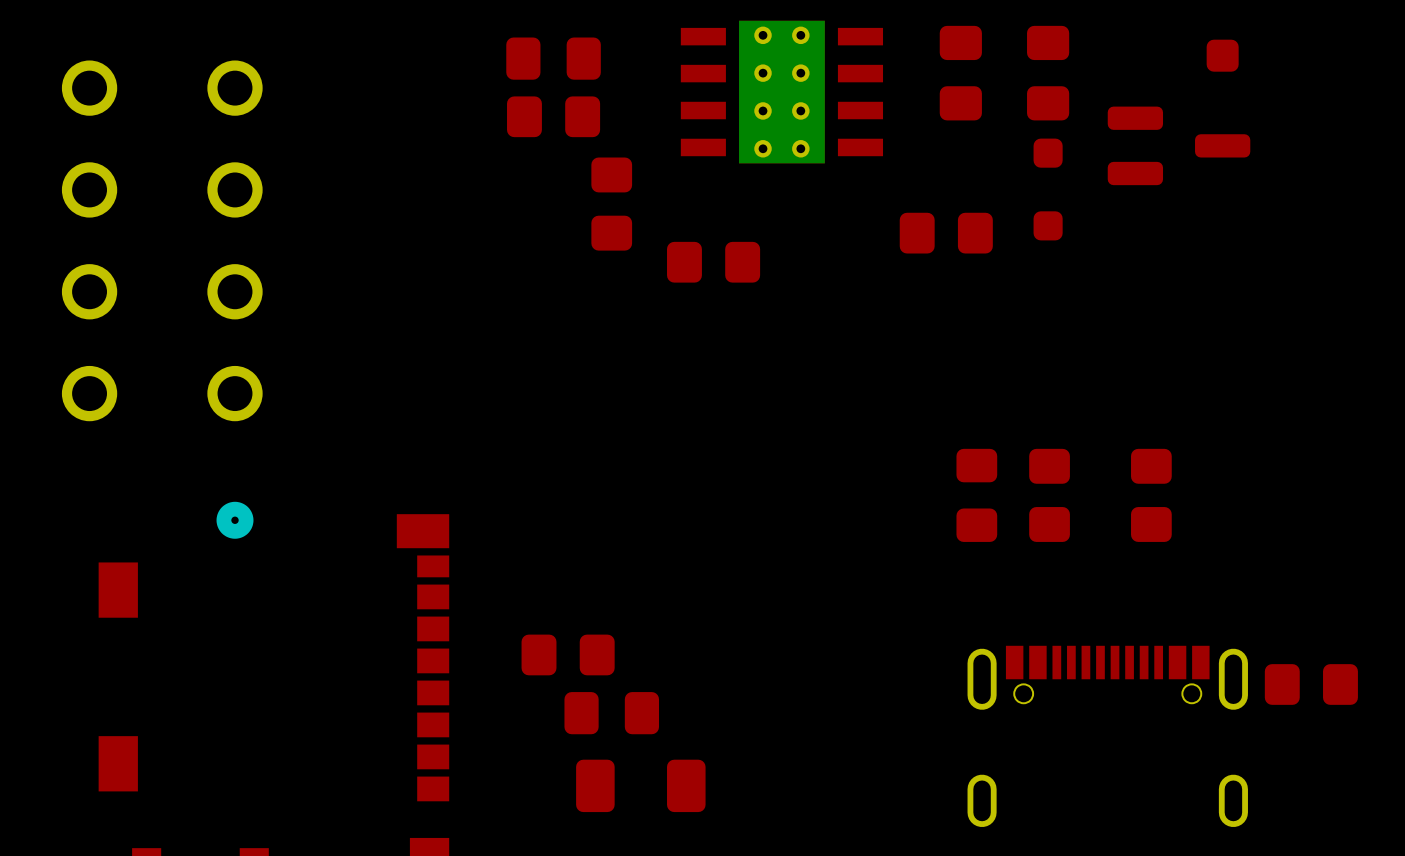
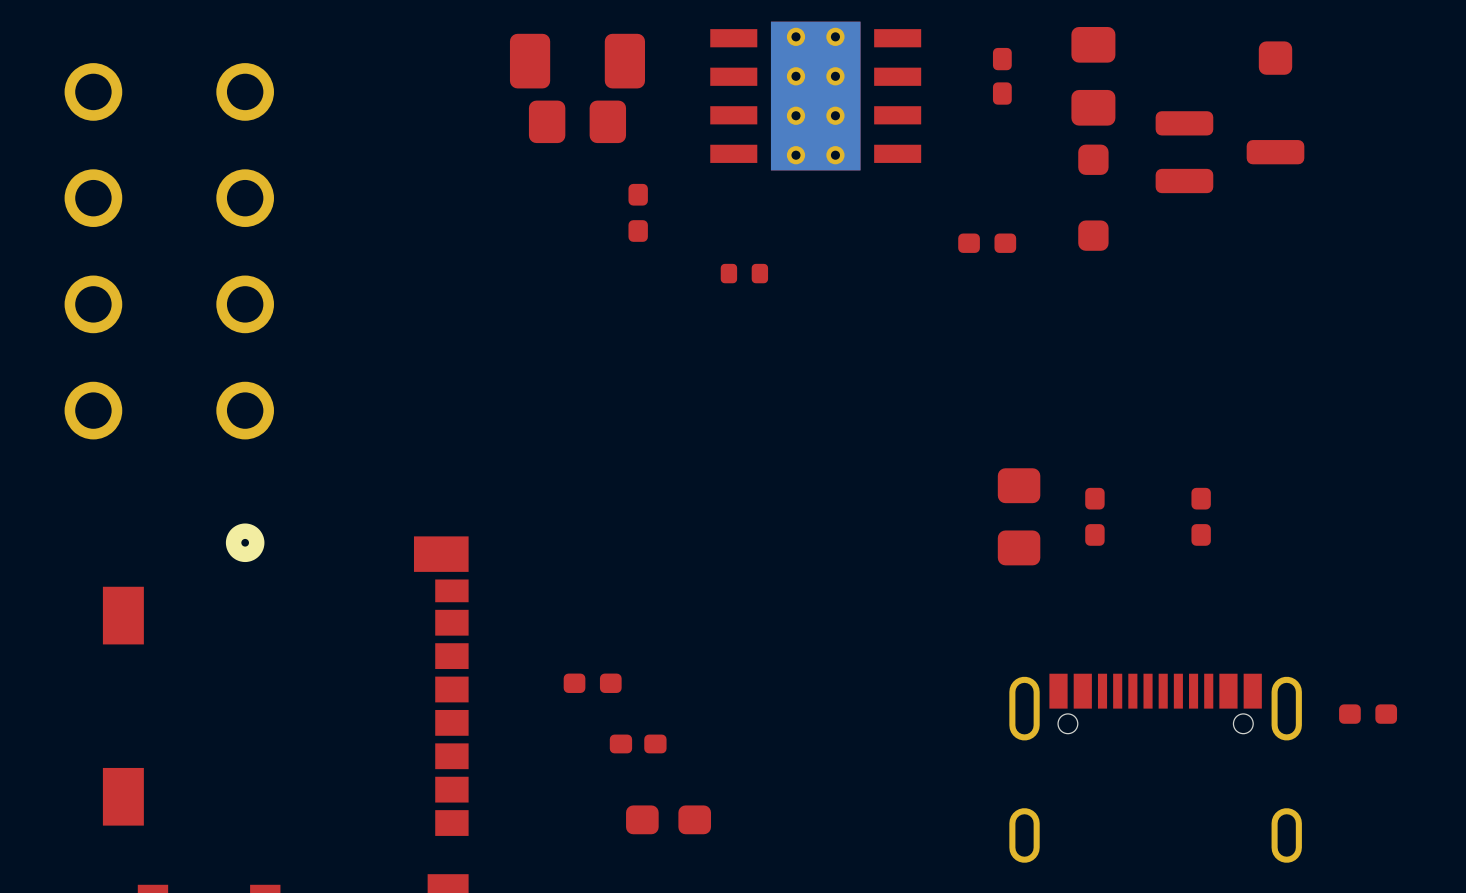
part footprint: [939, 25, 982, 121] -> [992, 47, 1012, 105]
part footprint: [506, 37, 601, 80] -> [509, 33, 646, 89]
part footprint: [591, 157, 633, 251] -> [628, 183, 648, 242]
part footprint: [899, 212, 993, 254] -> [958, 233, 1017, 253]
part footprint: [667, 241, 761, 283] -> [720, 263, 769, 284]
part footprint: [1029, 448, 1070, 542] -> [1085, 487, 1105, 546]
part footprint: [1131, 448, 1172, 542] -> [1191, 487, 1211, 546]
part footprint: [521, 634, 615, 676] -> [563, 673, 622, 693]
part footprint: [1264, 664, 1358, 705] -> [1339, 704, 1398, 724]
part footprint: [564, 692, 660, 735] -> [609, 734, 667, 754]
part footprint: [576, 759, 706, 813] -> [626, 805, 712, 835]

